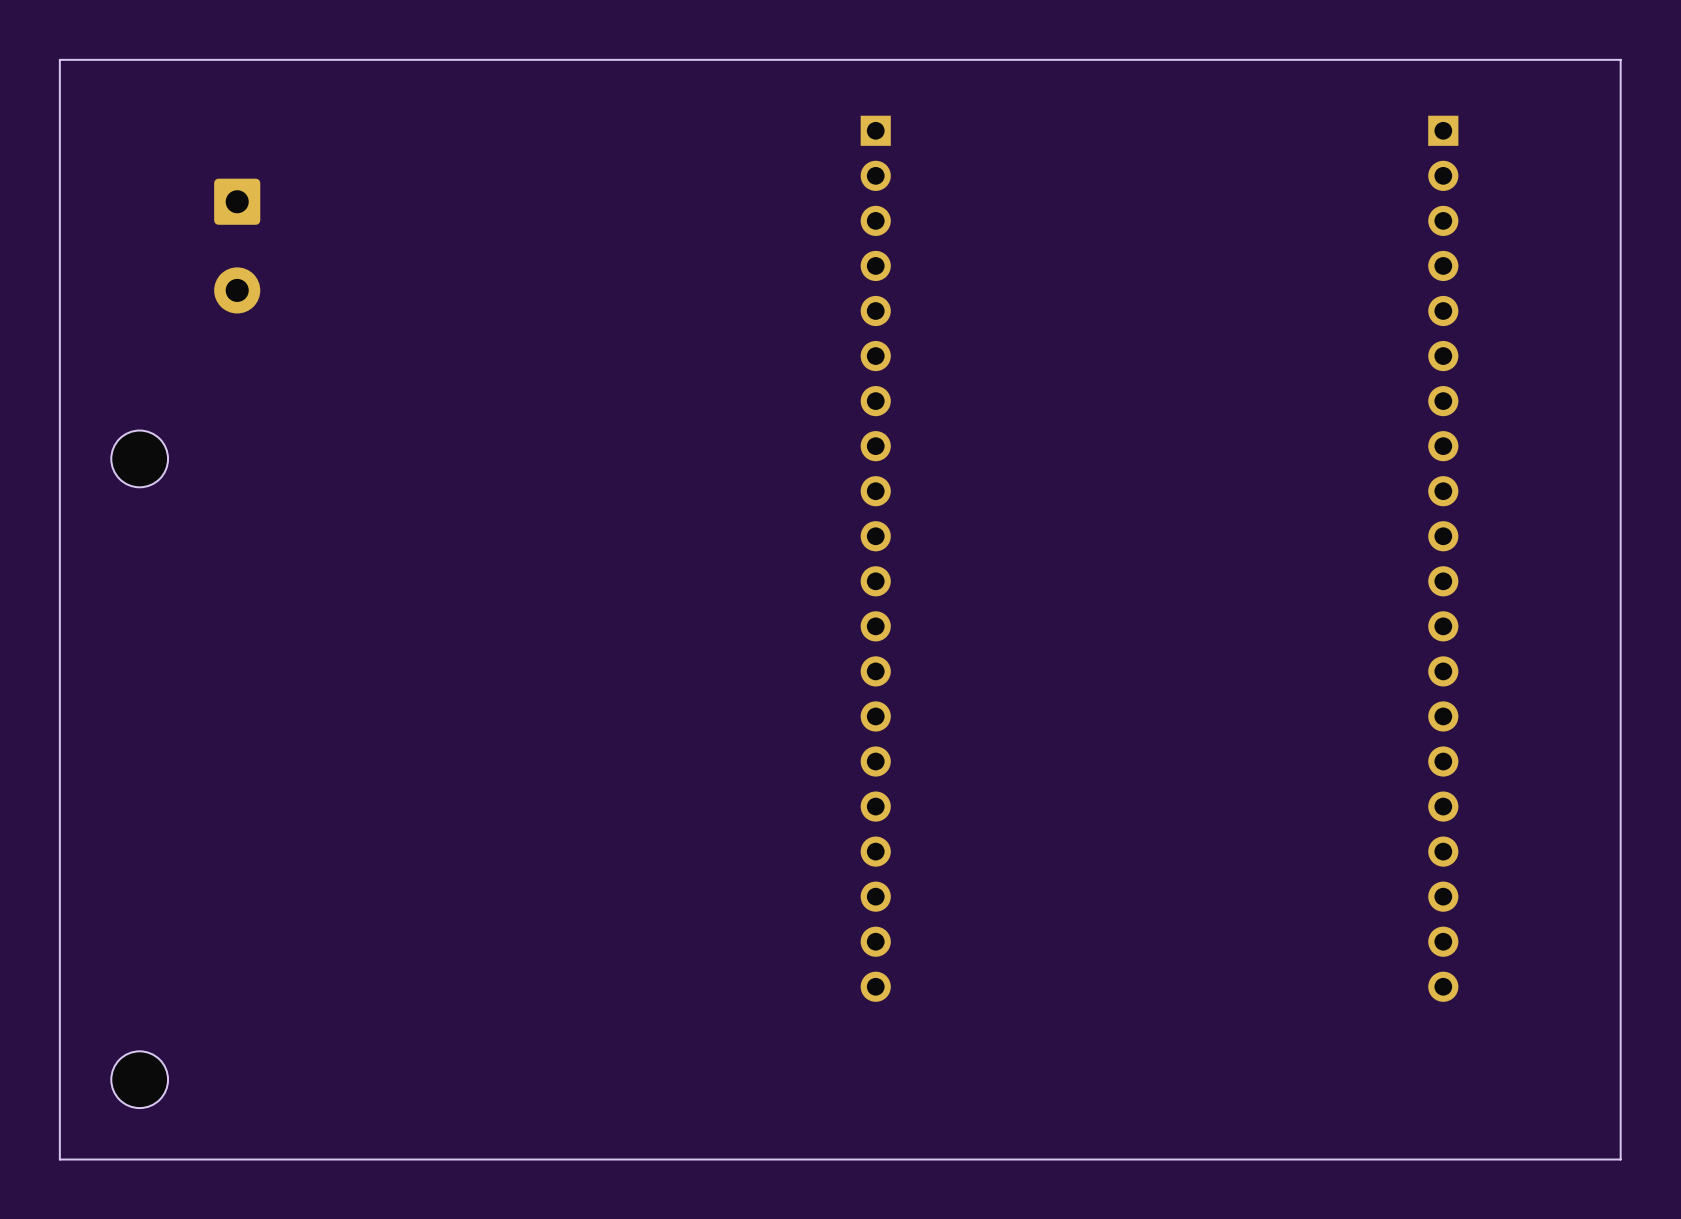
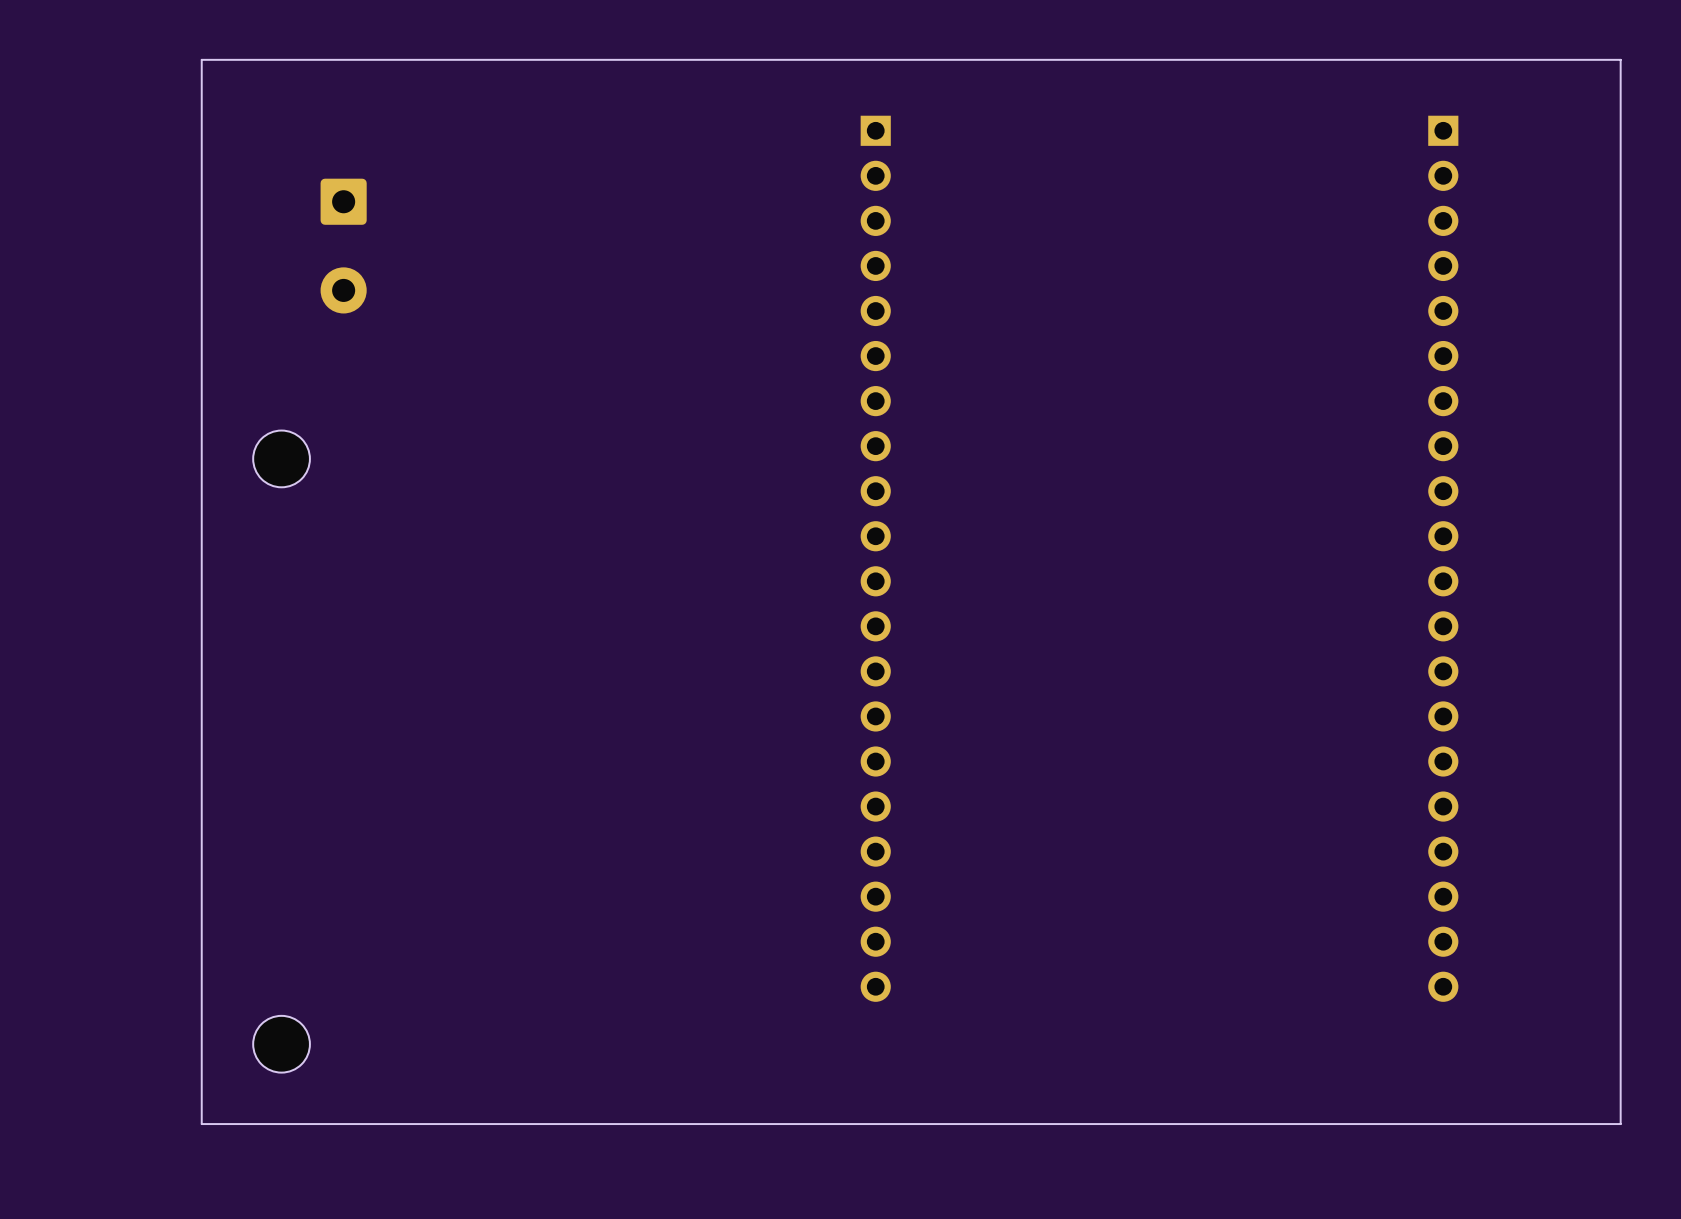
board edge: (201, 59) (59, 59) (59, 1159) (1620, 1159) (1620, 1124) -> (201, 59) (201, 1124) (1620, 1124)
part position: (237, 246) -> (343, 246)
part position: (139, 458) -> (281, 458)
part position: (139, 1079) -> (281, 1044)

